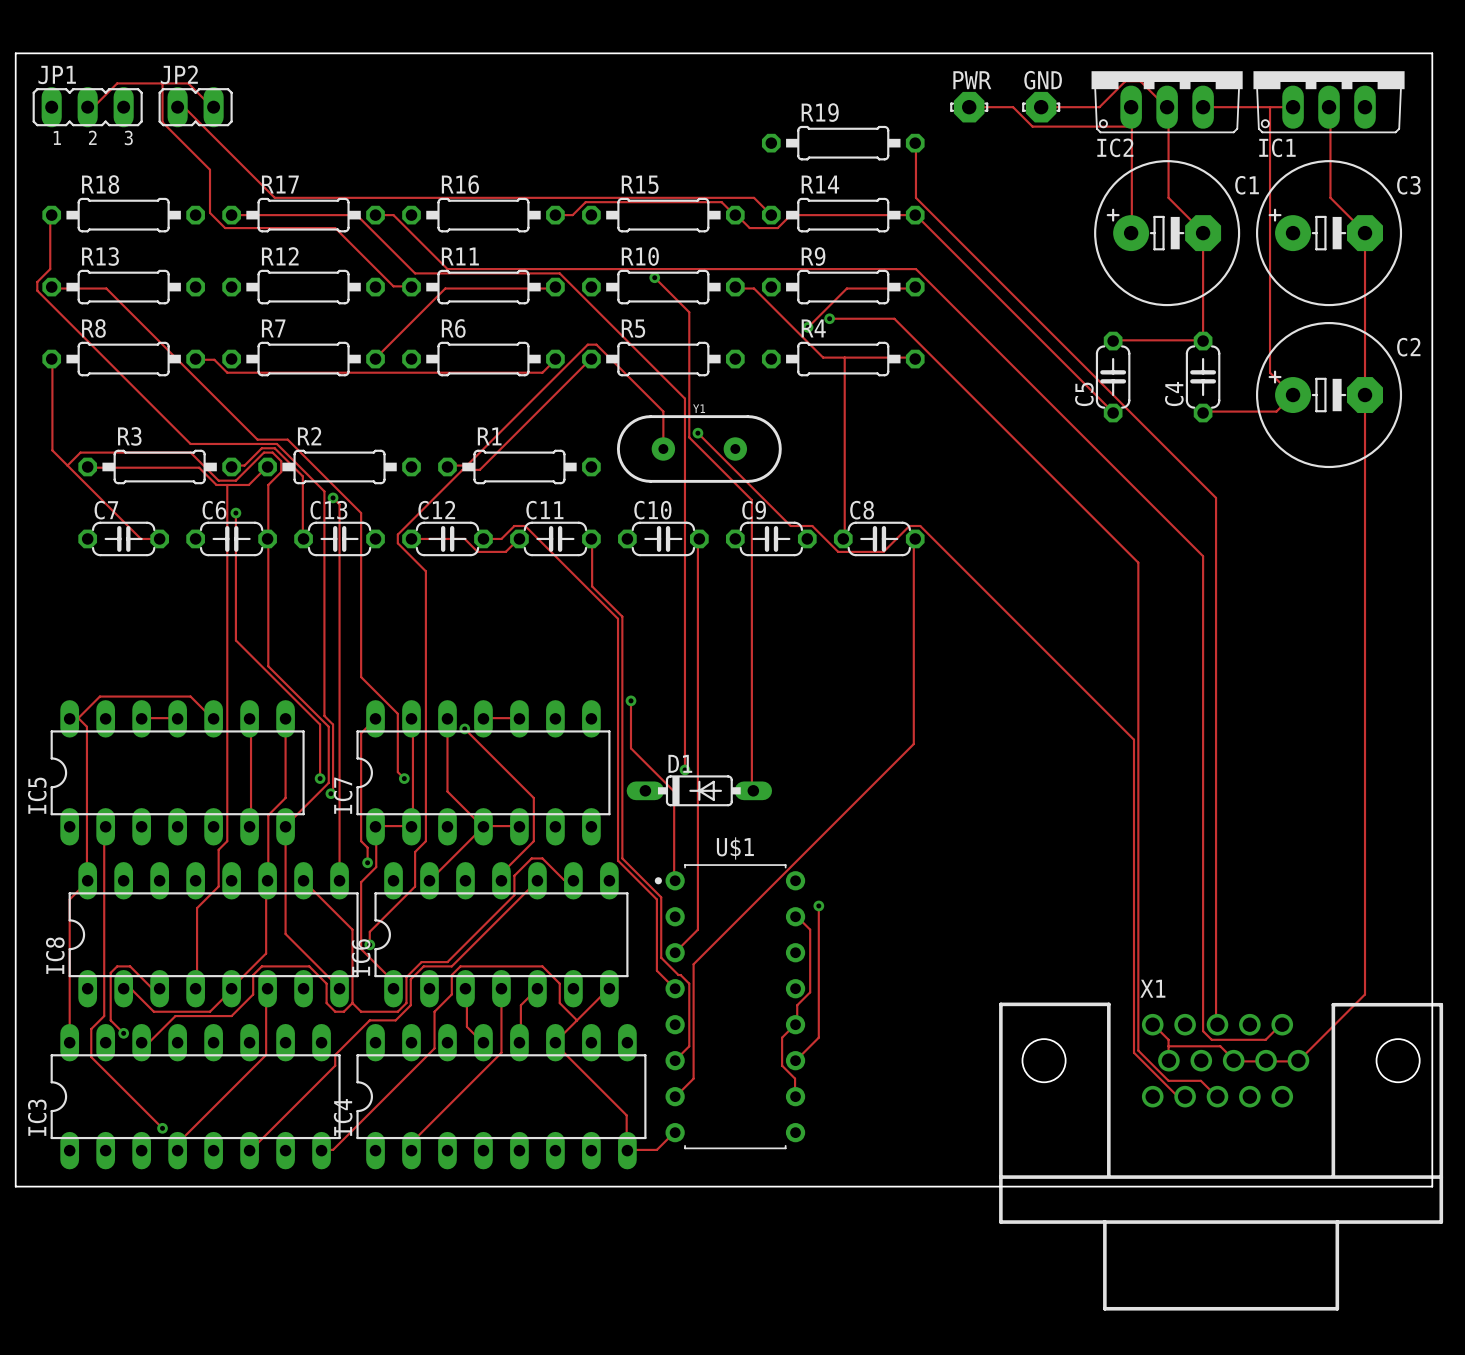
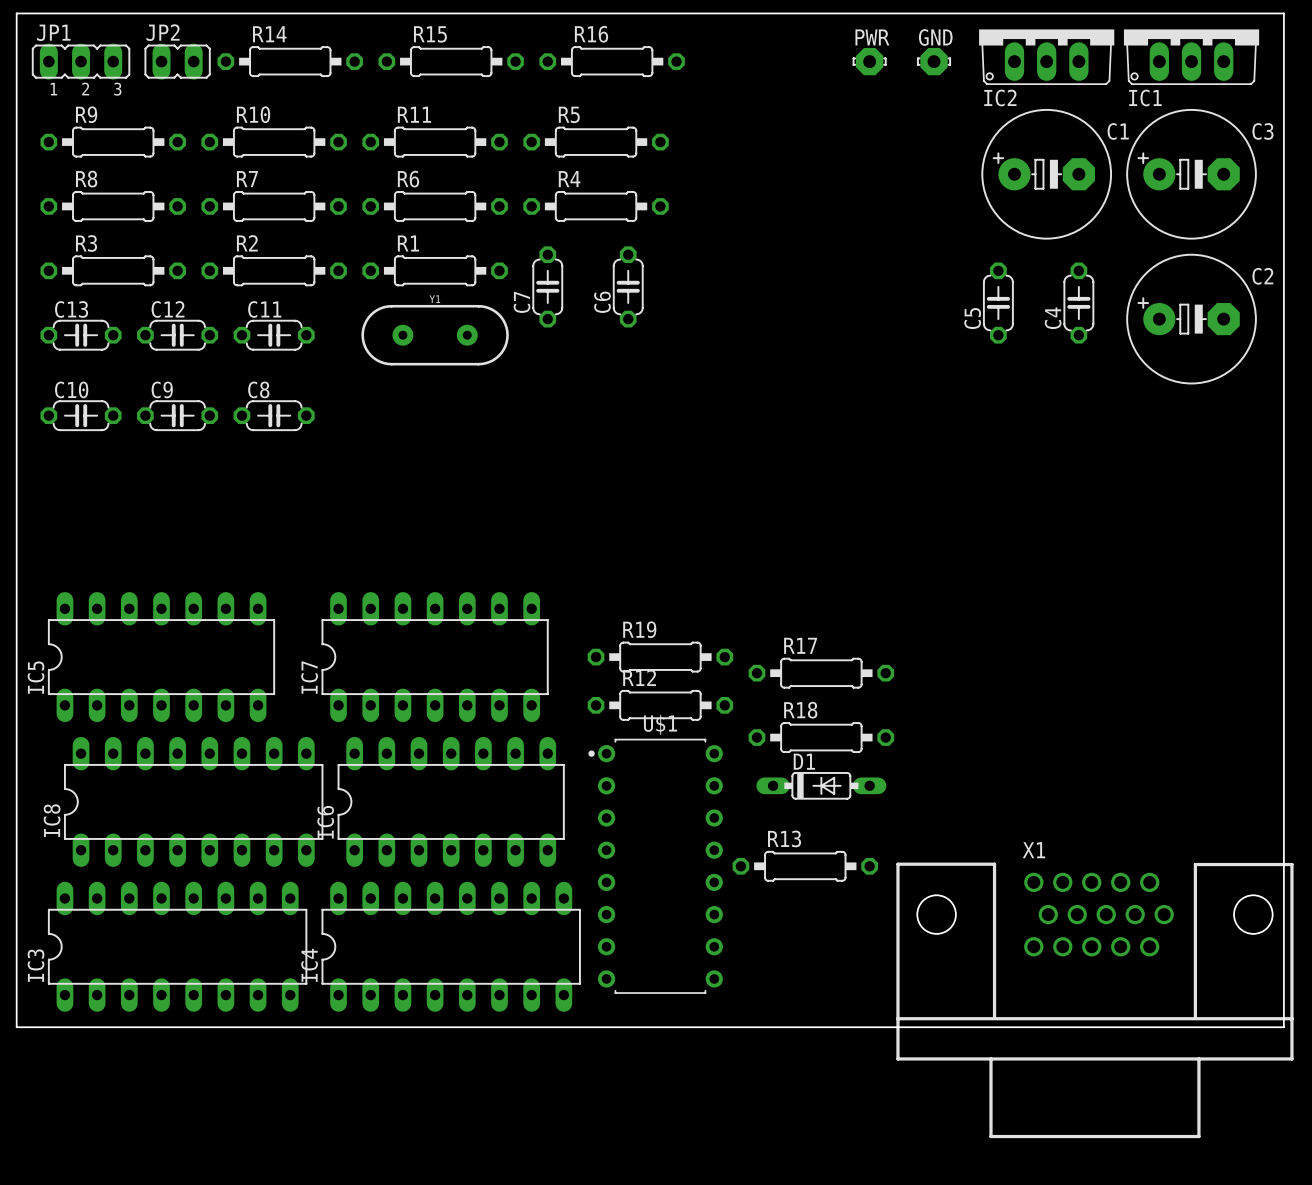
track: (162, 83) (162, 122) (210, 169) (210, 212) (225, 228) (335, 228) (393, 286) (411, 287) -> none
track: (87, 107) (93, 107) (117, 83) (188, 83) (213, 107) -> none
track: (177, 107) (184, 107) (274, 197) (754, 197) (771, 215) -> none
track: (969, 107) (1013, 107) (1032, 126) (1131, 126) (1131, 107) (1131, 107) (1131, 232) (1131, 233) -> none
track: (1041, 107) (1099, 107) (1125, 81) (1140, 81) (1168, 107) (1168, 197) (1203, 232) (1203, 341) -> none
track: (1203, 107) (1293, 107) -> none
track: (1270, 107) (1270, 372) (1293, 395) (1276, 411) (1203, 413) -> none
track: (1329, 107) (1330, 197) (1365, 232) (1365, 994) (1298, 1061) (1235, 1061) (1220, 1046) (1168, 1046) -> none
R19 position: (843, 143) -> (660, 657)
track: (915, 143) (915, 197) (1216, 497) (1217, 1024) -> none
track: (51, 215) (50, 269) (37, 282) (37, 290) (190, 443) (276, 443) (324, 491) (324, 715) (333, 724) (333, 791) (330, 793) -> none
R18 position: (123, 215) -> (821, 737)
track: (231, 215) (356, 215) (415, 273) (559, 273) (684, 398) (684, 769) -> none
R17 position: (303, 215) -> (821, 673)
track: (375, 215) (393, 215) (447, 269) (915, 269) (1203, 556) (1203, 1031) (1211, 1039) (1265, 1039) (1282, 1024) -> none
R16 position: (483, 215) -> (612, 61)
track: (555, 215) (572, 215) (585, 202) (721, 202) (749, 228) (777, 228) (790, 215) (915, 215) (1113, 413) -> none
R15 position: (663, 215) -> (451, 61)
R14 position: (843, 215) -> (290, 61)
track: (654, 277) (689, 312) (689, 437) (751, 500) (753, 790) -> none
via: (654, 277) -> none
track: (51, 287) (106, 288) (257, 439) (287, 439) (361, 513) (361, 677) (397, 713) (397, 772) (404, 778) -> none
R13 position: (123, 287) -> (805, 866)
R12 position: (303, 287) -> (660, 705)
R11 position: (483, 287) -> (435, 142)
track: (555, 287) (445, 288) (375, 359) -> none
R10 position: (663, 287) -> (274, 142)
track: (735, 287) (754, 288) (823, 357) (915, 359) -> none
R9 position: (843, 287) -> (113, 142)
track: (915, 287) (846, 288) (808, 327) -> none
track: (829, 318) (894, 318) (1138, 562) (1138, 1050) (1168, 1080) (1200, 1080) (1217, 1096) -> none
via: (829, 318) -> none
via: (808, 327) -> none
track: (1203, 340) (1113, 341) -> none
track: (844, 357) (843, 538) -> none
track: (51, 359) (52, 450) (140, 538) (159, 538) -> none
R8 position: (123, 359) -> (113, 206)
track: (195, 359) (214, 359) (227, 372) (542, 372) (555, 359) -> none
R7 position: (303, 359) -> (274, 206)
R6 position: (483, 359) -> (435, 206)
track: (591, 359) (479, 469) (462, 469) (397, 534) (397, 543) (425, 571) (425, 841) (415, 851) (415, 886) (369, 931) (369, 944) -> none
R5 position: (663, 359) -> (596, 142)
R4 position: (843, 359) -> (596, 206)
track: (697, 433) (790, 525) (812, 525) (838, 551) (883, 551) (909, 525) (920, 525) (1134, 739) (1134, 1052) (1177, 1095) (1185, 1096) -> none
via: (697, 433) -> none
track: (663, 448) (663, 411) (596, 344) (587, 344) (466, 465) (447, 466) -> none
Y1 position: (699, 448) -> (435, 335)
track: (67, 465) (80, 452) (190, 452) (218, 480) (235, 480) (263, 452) (272, 452) (281, 461) (281, 472) (268, 484) (268, 666) (328, 726) (328, 782) (285, 826) (285, 934) (339, 988) -> none
track: (87, 466) (199, 467) (216, 484) (248, 484) (267, 466) -> none
R3 position: (159, 466) -> (113, 270)
track: (231, 466) (244, 465) (261, 448) (274, 448) (302, 476) (303, 538) -> none
R2 position: (339, 466) -> (274, 270)
R1 position: (519, 466) -> (435, 270)
track: (227, 484) (227, 841) (218, 849) (218, 886) (197, 908) (195, 988) -> none
track: (333, 497) (339, 504) (339, 880) -> none
via: (333, 497) -> none
track: (235, 513) (235, 640) (320, 724) (320, 778) -> none
via: (235, 513) -> none
C7 rotation: 0° (123, 538) -> 90° counterclockwise (547, 286)
C7 position: (123, 538) -> (547, 286)
C6 rotation: 0° (231, 538) -> 90° counterclockwise (628, 286)
C6 position: (231, 538) -> (628, 286)
C13 position: (339, 538) -> (81, 335)
track: (411, 538) (464, 538) (477, 551) (505, 551) (519, 538) -> none
C12 position: (447, 538) -> (177, 335)
track: (483, 538) (501, 538) (514, 525) (525, 525) (618, 618) (618, 860) (656, 899) (656, 970) (675, 988) -> none
C11 position: (555, 538) -> (274, 335)
track: (591, 538) (592, 586) (622, 616) (622, 858) (661, 897) (661, 957) (689, 983) (689, 1046) (675, 1060) -> none
C10 position: (663, 538) -> (81, 415)
track: (699, 538) (697, 929) (675, 952) -> none
C9 position: (771, 538) -> (177, 415)
C8 position: (879, 538) -> (274, 415)
track: (915, 538) (913, 744) (693, 964) (693, 1078) (675, 1096) -> none
track: (630, 700) (630, 748) (674, 791) (675, 880) -> none
via: (630, 700) -> none
track: (78, 718) (99, 696) (190, 696) (213, 718) -> none
track: (78, 718) (86, 726) (87, 880) (69, 899) (69, 1042) -> none
track: (141, 718) (177, 718) -> none
track: (249, 718) (249, 826) -> none
track: (285, 718) (285, 798) (268, 815) (266, 953) (210, 1011) (153, 1011) (132, 990) (123, 988) -> none
track: (375, 718) (361, 733) (361, 841) (367, 847) (367, 862) -> none
track: (411, 718) (412, 826) (375, 826) (376, 867) (361, 882) (361, 949) (393, 981) (393, 988) -> none
track: (447, 718) (447, 791) (483, 826) -> none
track: (483, 718) (519, 718) -> none
track: (464, 728) (533, 798) (533, 841) (501, 873) (501, 880) -> none
via: (464, 728) -> none
via: (684, 769) -> none
via: (320, 778) -> none
via: (404, 778) -> none
D1 position: (699, 790) -> (821, 785)
via: (330, 793) -> none
track: (105, 826) (104, 1016) (91, 1029) (91, 1057) (162, 1128) -> none
track: (519, 826) (484, 826) (429, 880) -> none
via: (367, 862) -> none
track: (303, 880) (352, 929) (352, 1003) -> none
track: (537, 880) (451, 966) (423, 966) (410, 979) (410, 1005) (395, 1020) (369, 1020) (335, 1054) (335, 1065) (249, 1150) -> none
track: (573, 880) (564, 880) (542, 858) (531, 858) (514, 875) (514, 895) (447, 962) (421, 962) (406, 977) (406, 1003) (397, 1011) (361, 1011) (352, 1003) -> none
track: (818, 905) (818, 1037) (795, 1060) -> none
via: (818, 905) -> none
track: (795, 916) (810, 929) (810, 992) (797, 1005) (797, 1024) (782, 1037) (782, 1065) (795, 1078) (795, 1096) -> none
via: (369, 944) -> none
track: (159, 988) (151, 987) (130, 966) (117, 966) (110, 972) (110, 1020) (123, 1033) -> none
track: (267, 988) (266, 1054) (177, 1143) (177, 1150) -> none
track: (465, 988) (466, 1026) (483, 1042) -> none
track: (501, 988) (501, 1052) (412, 1141) (411, 1150) -> none
track: (537, 988) (520, 1005) (519, 1042) -> none
track: (609, 988) (555, 1041) (555, 1044) (626, 1115) (627, 1150) (656, 1149) (675, 1132) -> none
track: (352, 1003) (343, 1011) (335, 1011) (326, 1003) (326, 983) (309, 966) (261, 966) (253, 975) (253, 994) (231, 1016) (175, 1016) (149, 1041) (141, 1042) -> none
track: (577, 1020) (559, 1003) (559, 983) (542, 966) (460, 966) (451, 975) (451, 994) (434, 1011) (434, 1048) (333, 1149) (321, 1150) -> none
track: (1152, 1024) (1168, 1039) (1168, 1060) -> none
via: (123, 1033) -> none
via: (162, 1128) -> none

